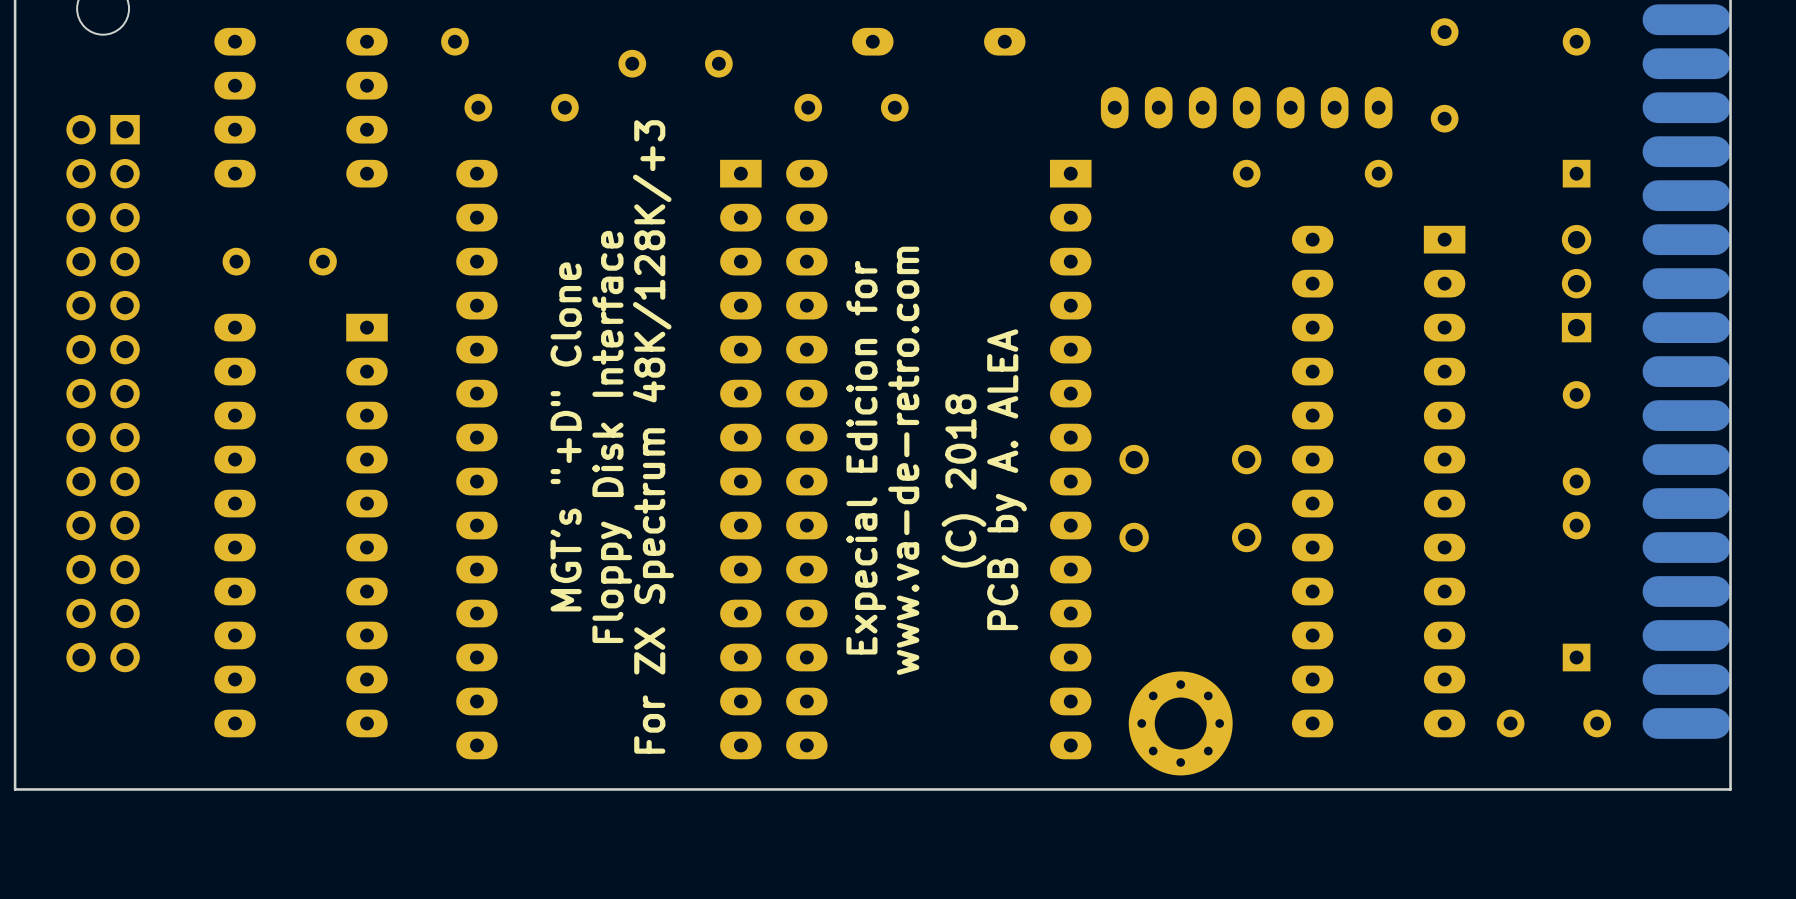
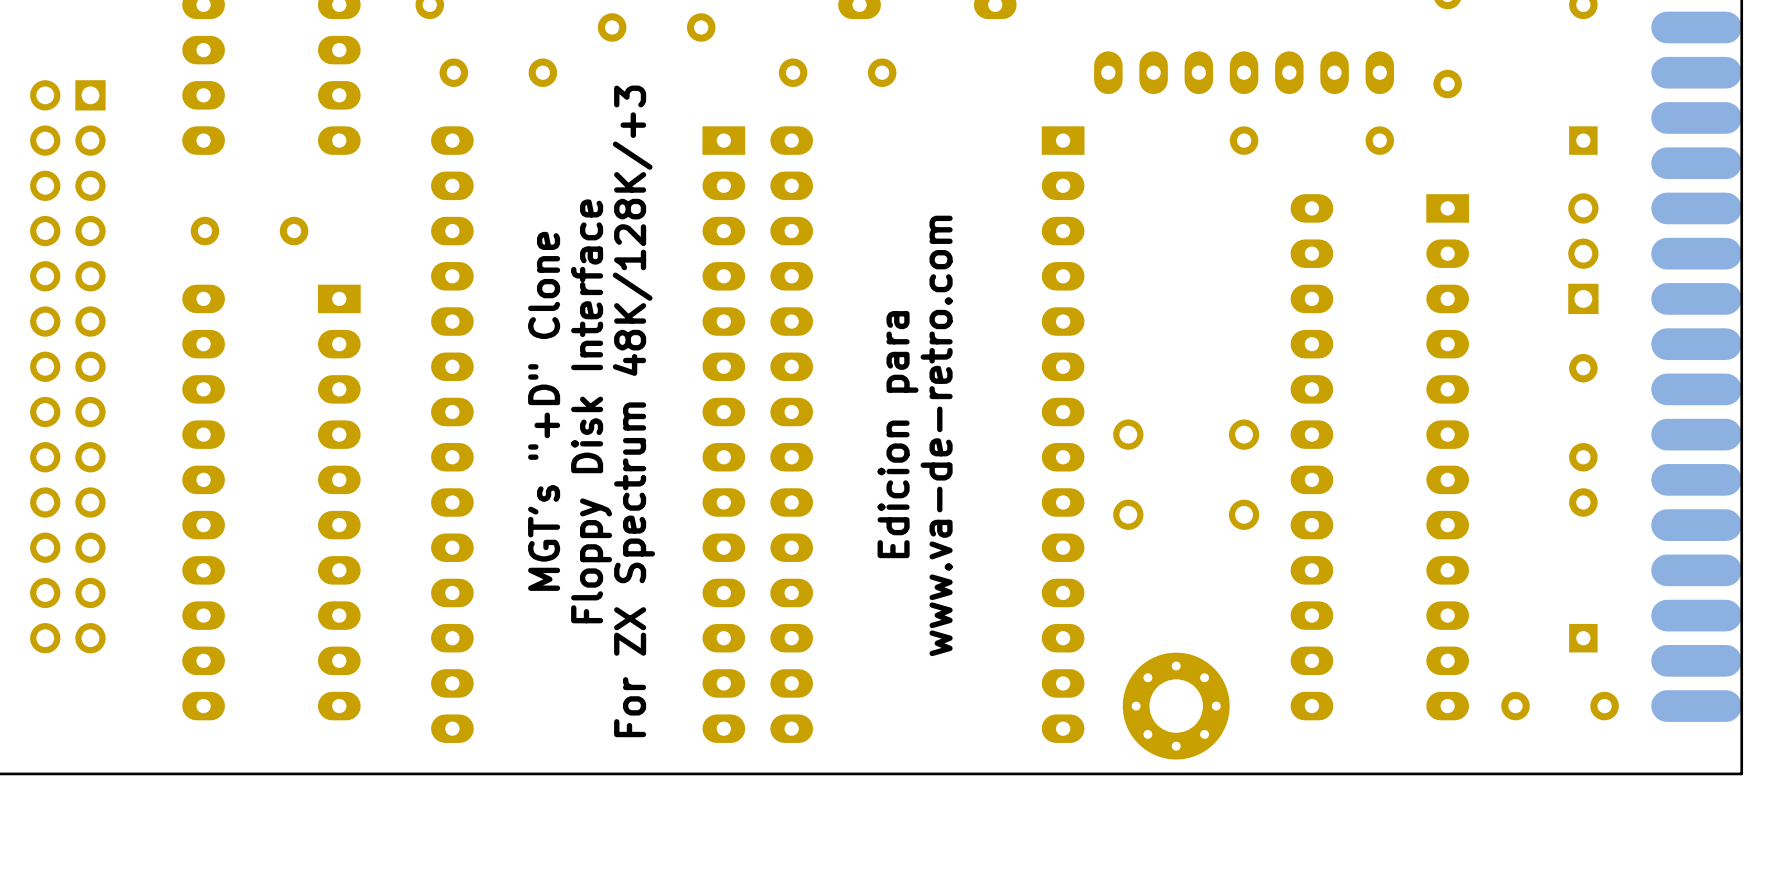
text: Expecial Edicion for (866, 457) -> none
text: www.va-de-retro.com (903, 460) -> Edicion para (898, 434)
text: none -> www.va-de-retro.com (936, 435)
text: PCB by A. ALEA (1007, 479) -> none
text: (C) 2018 (963, 480) -> none

